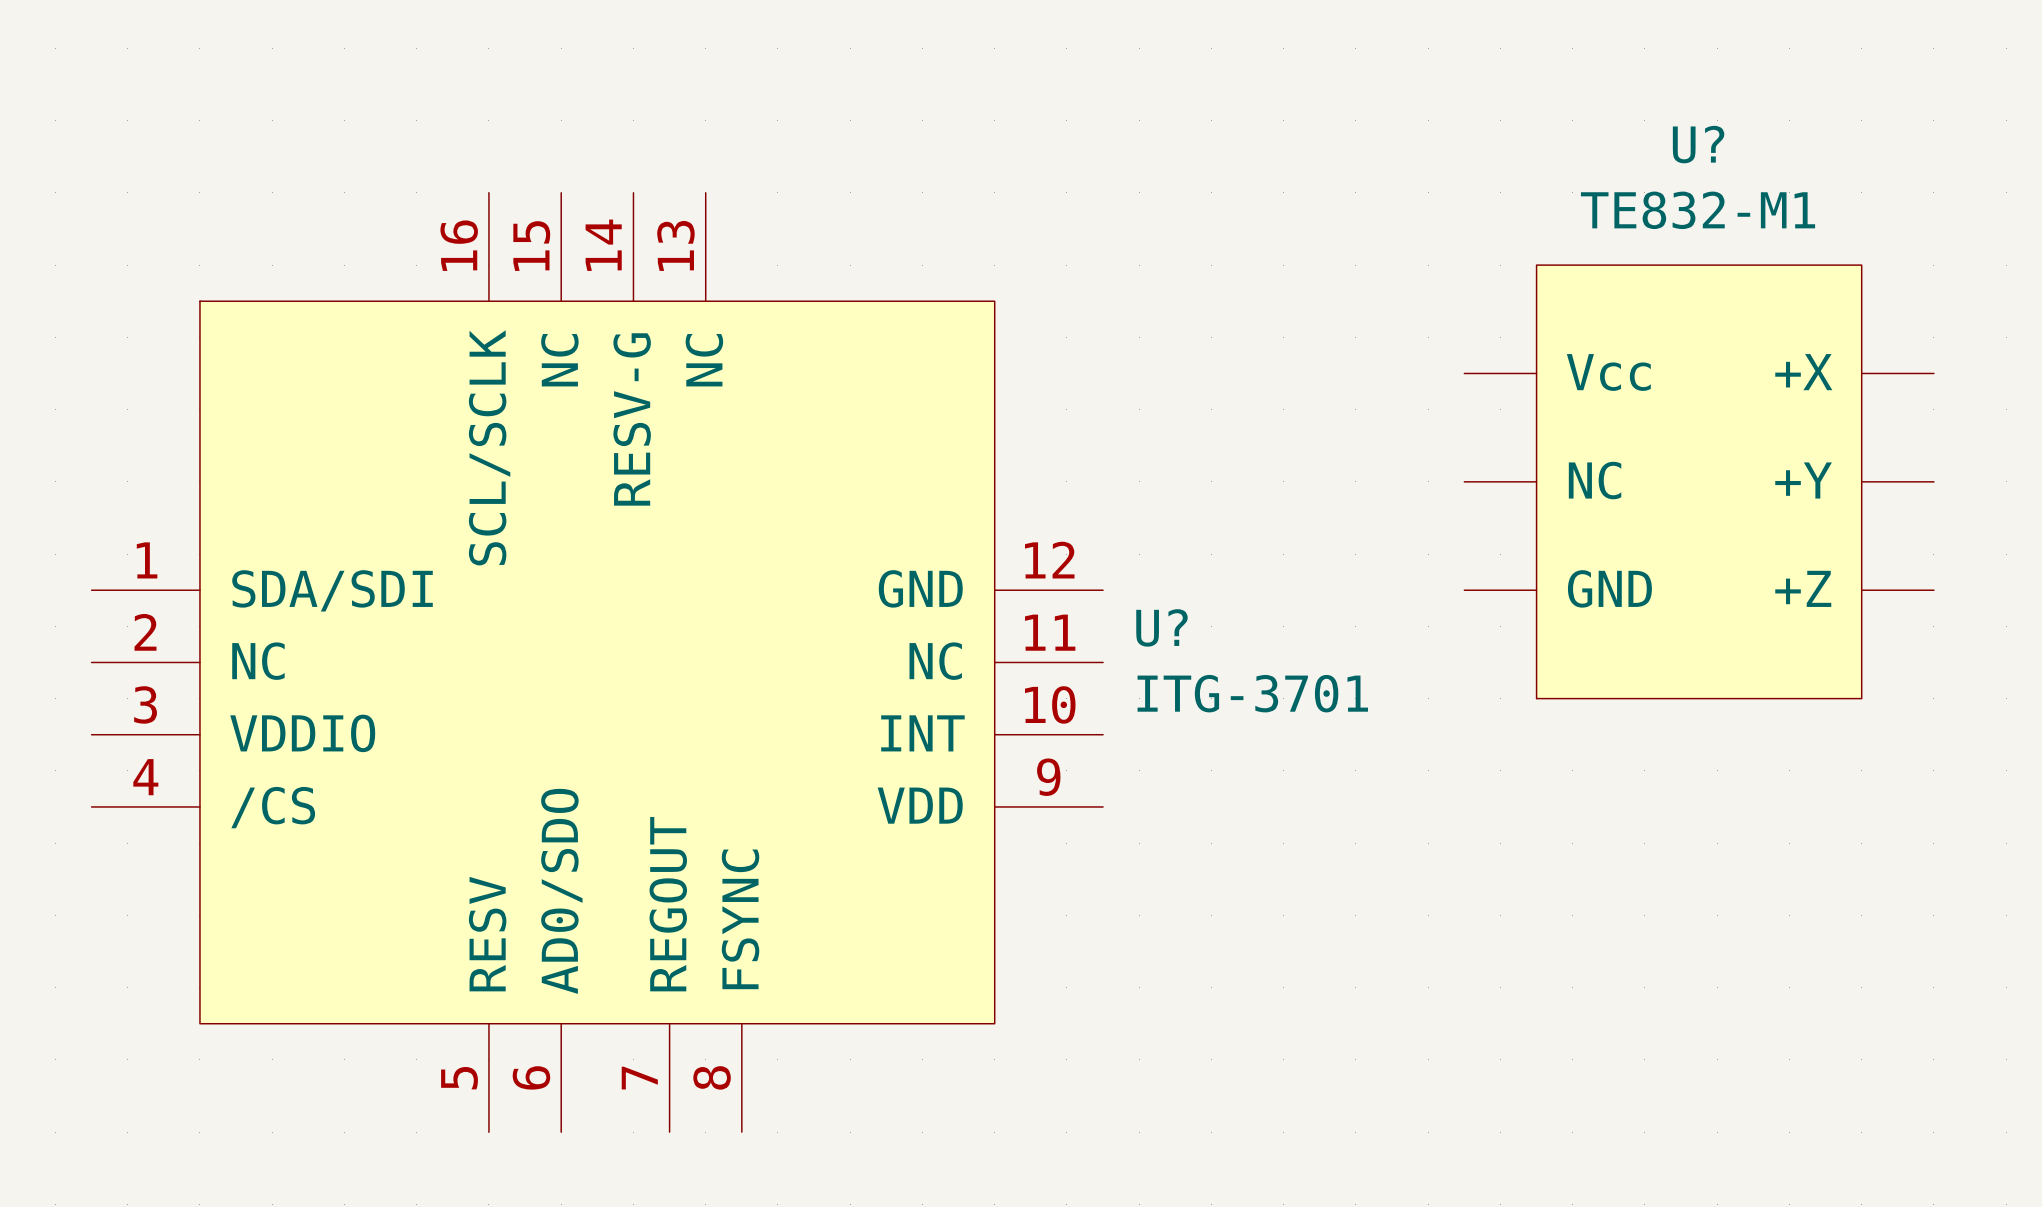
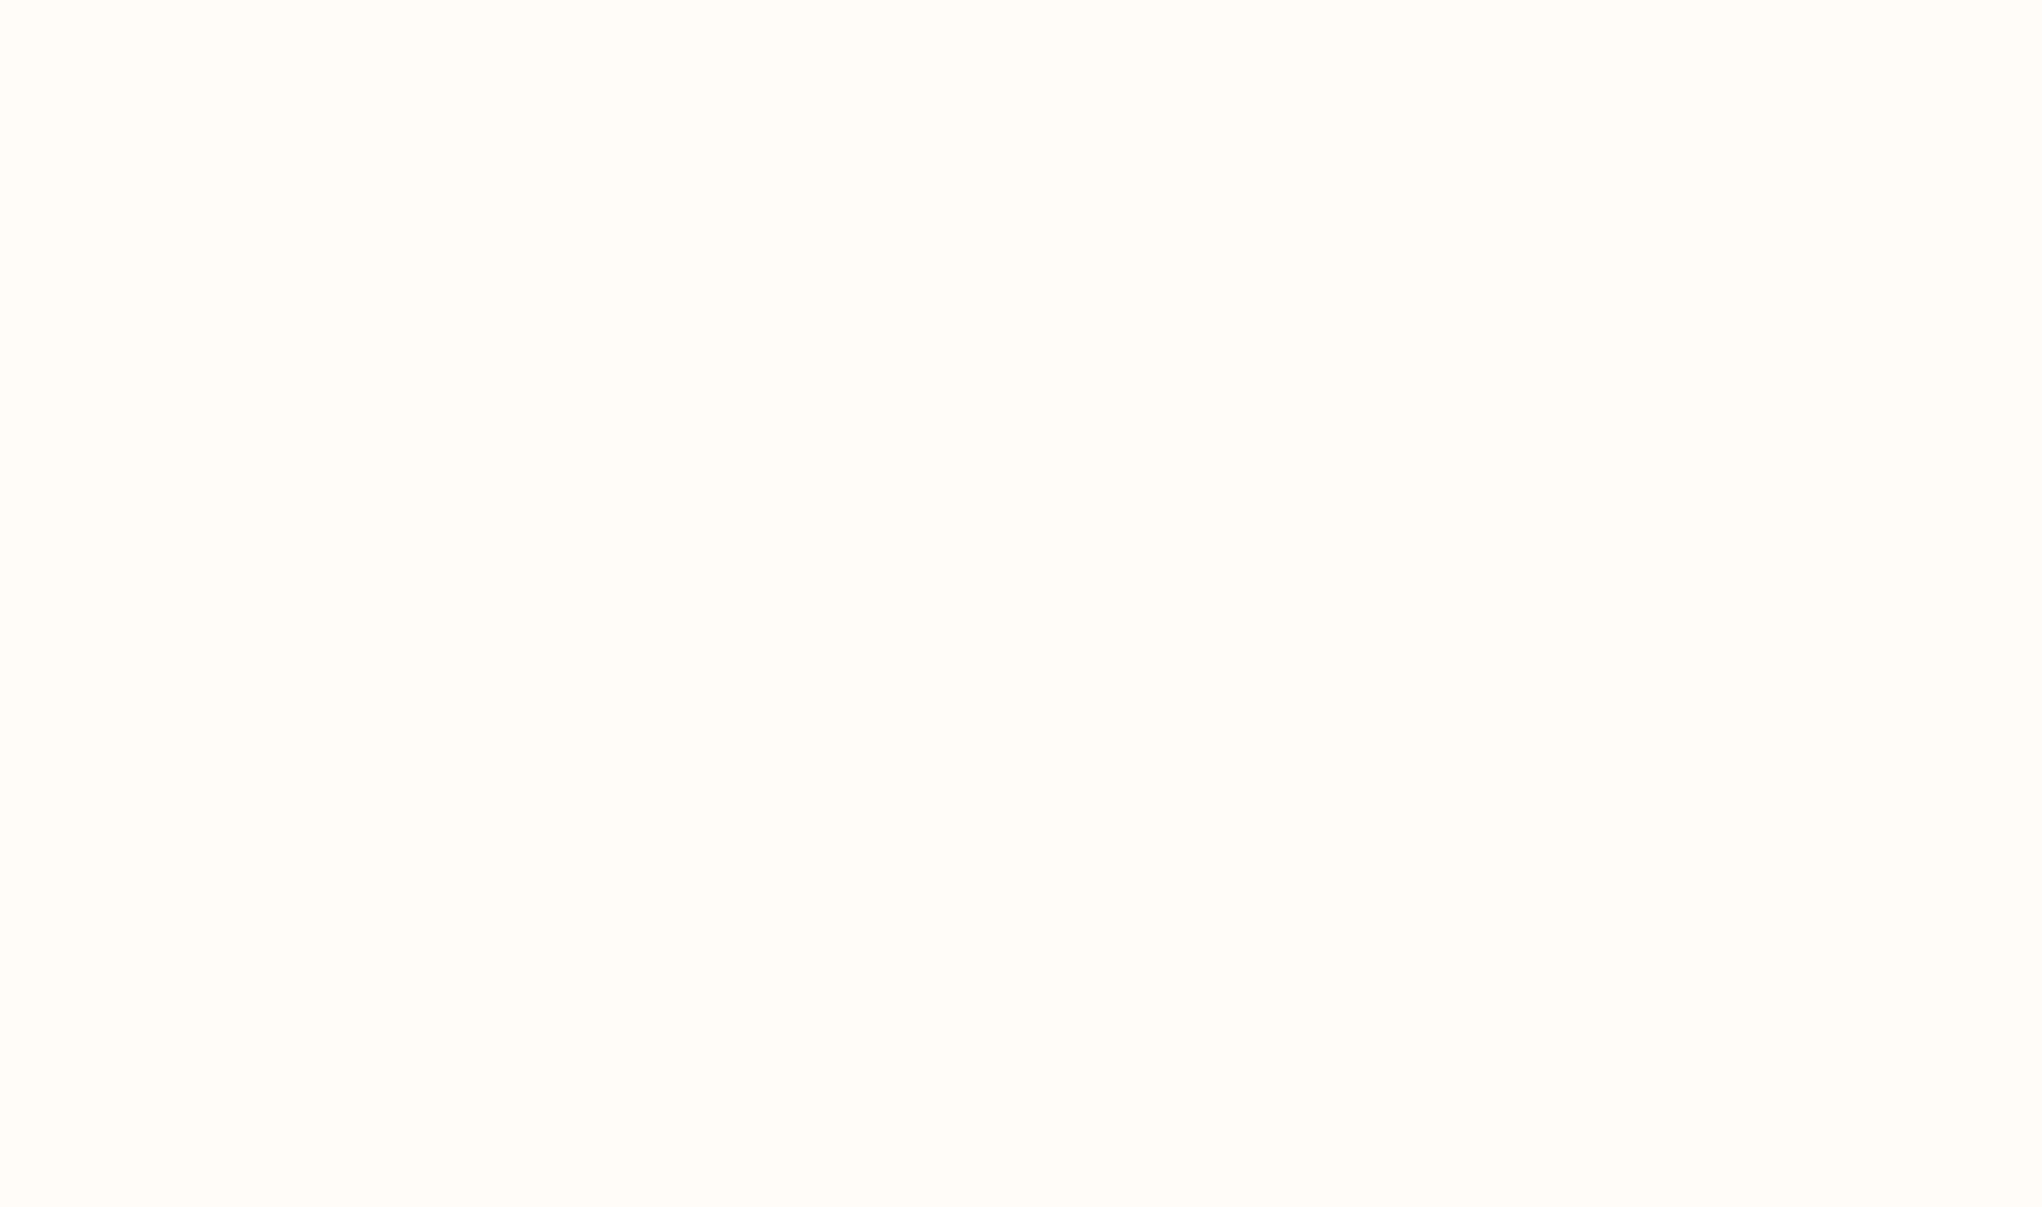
U?: TE832-M1 (1699, 481) -> none
U?: ITG-3701 (597, 662) -> none

